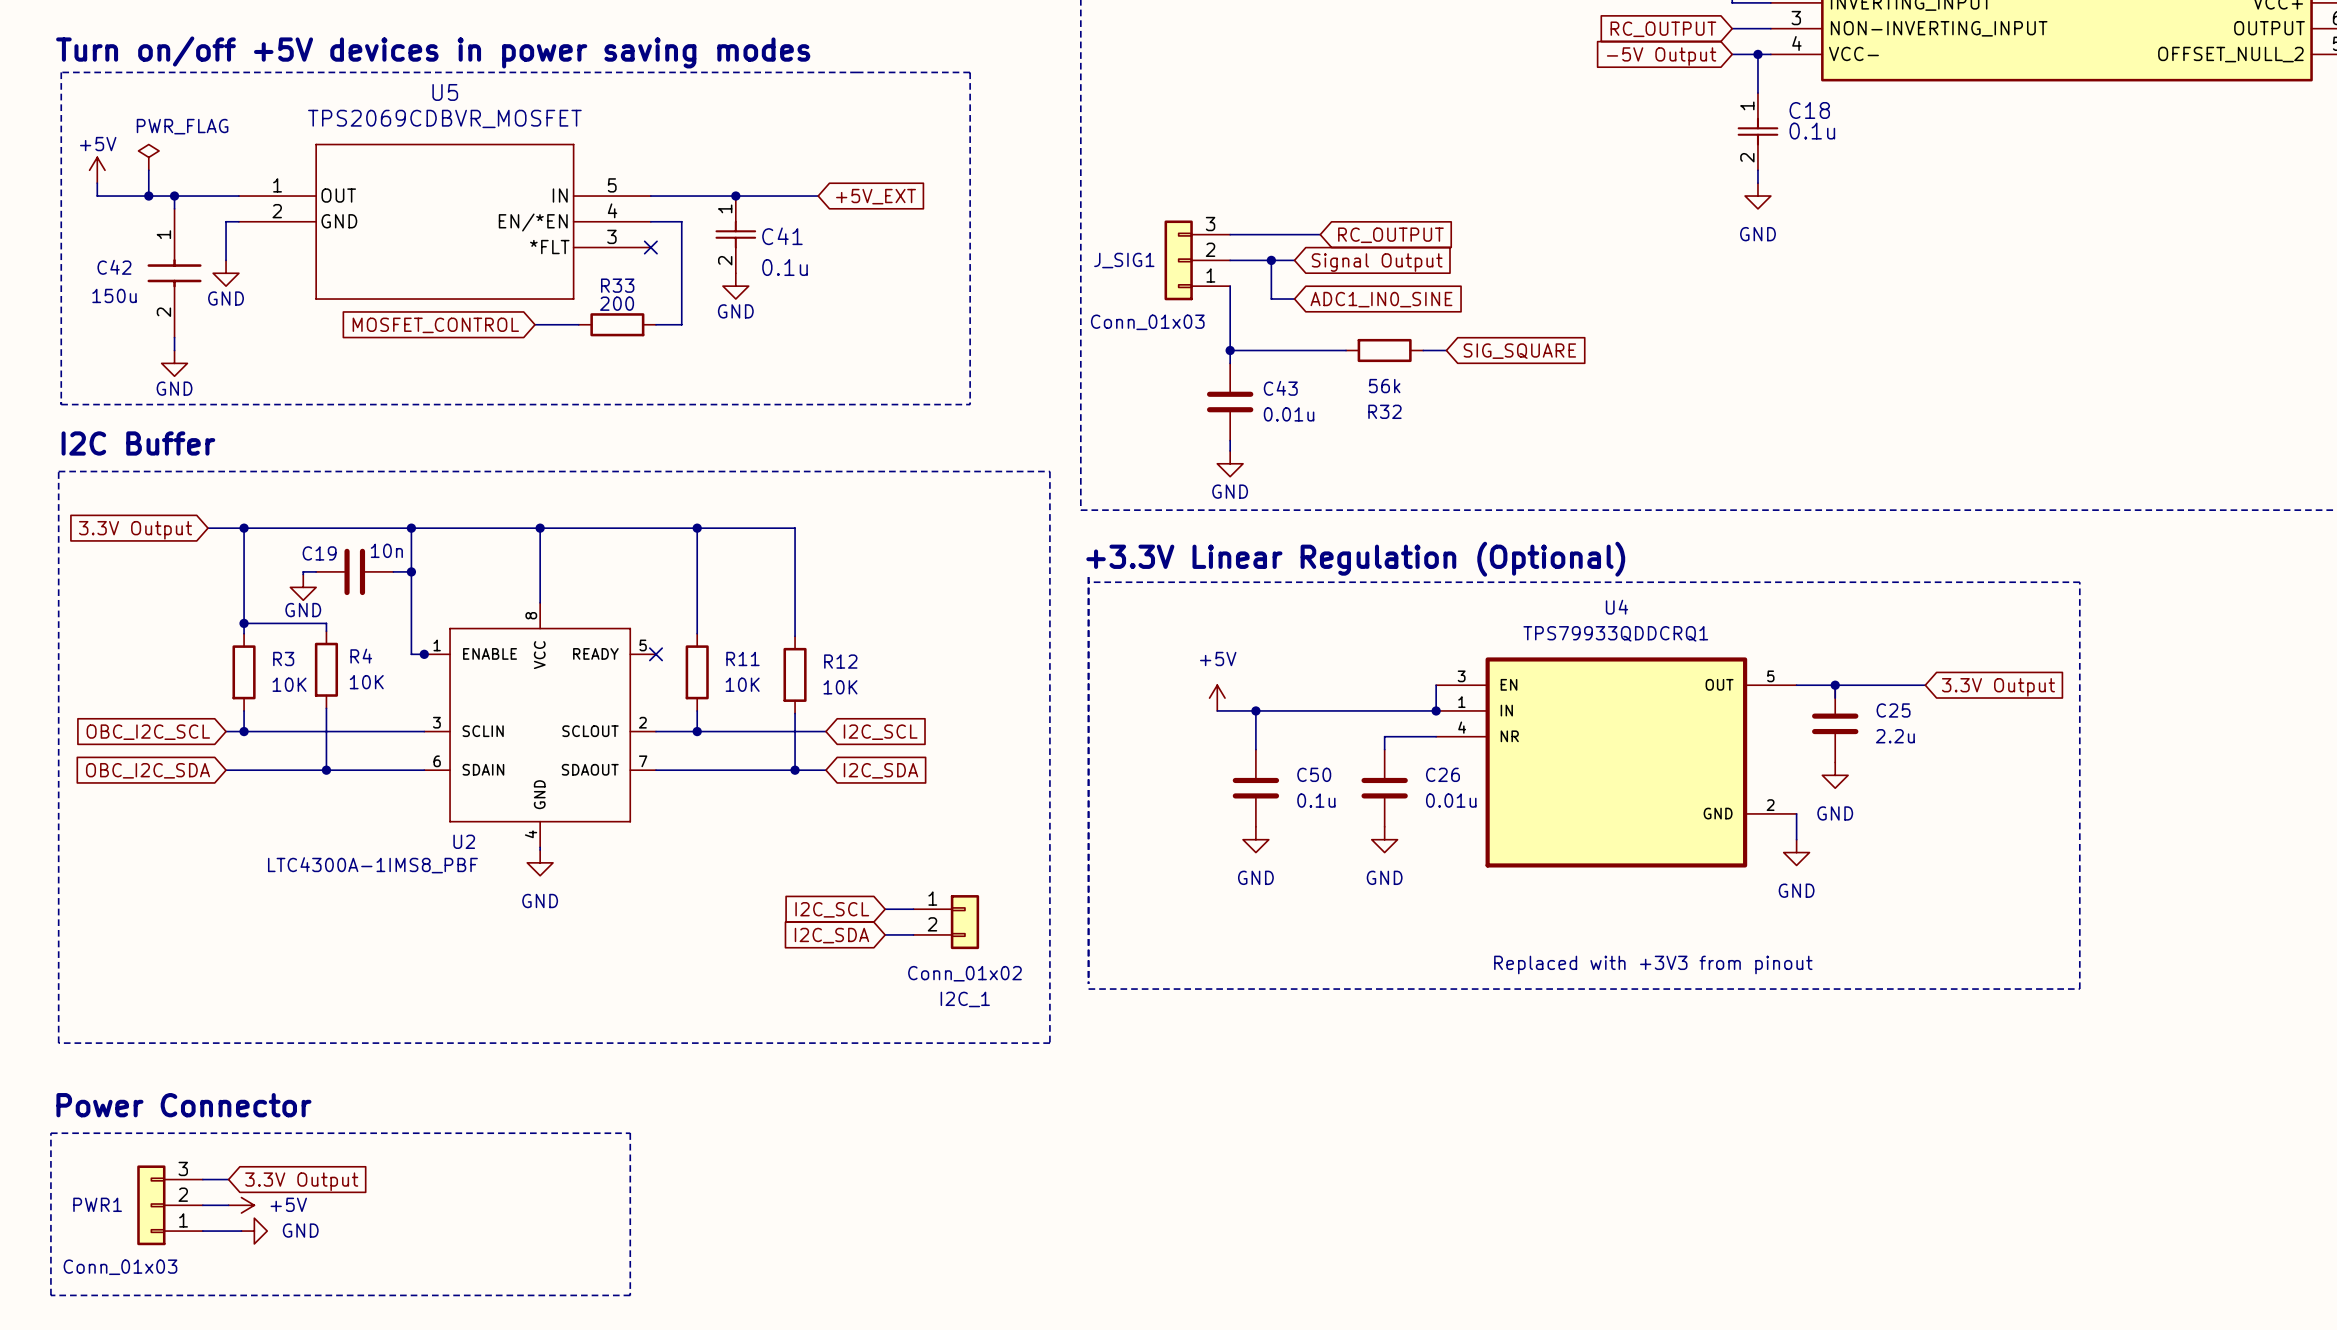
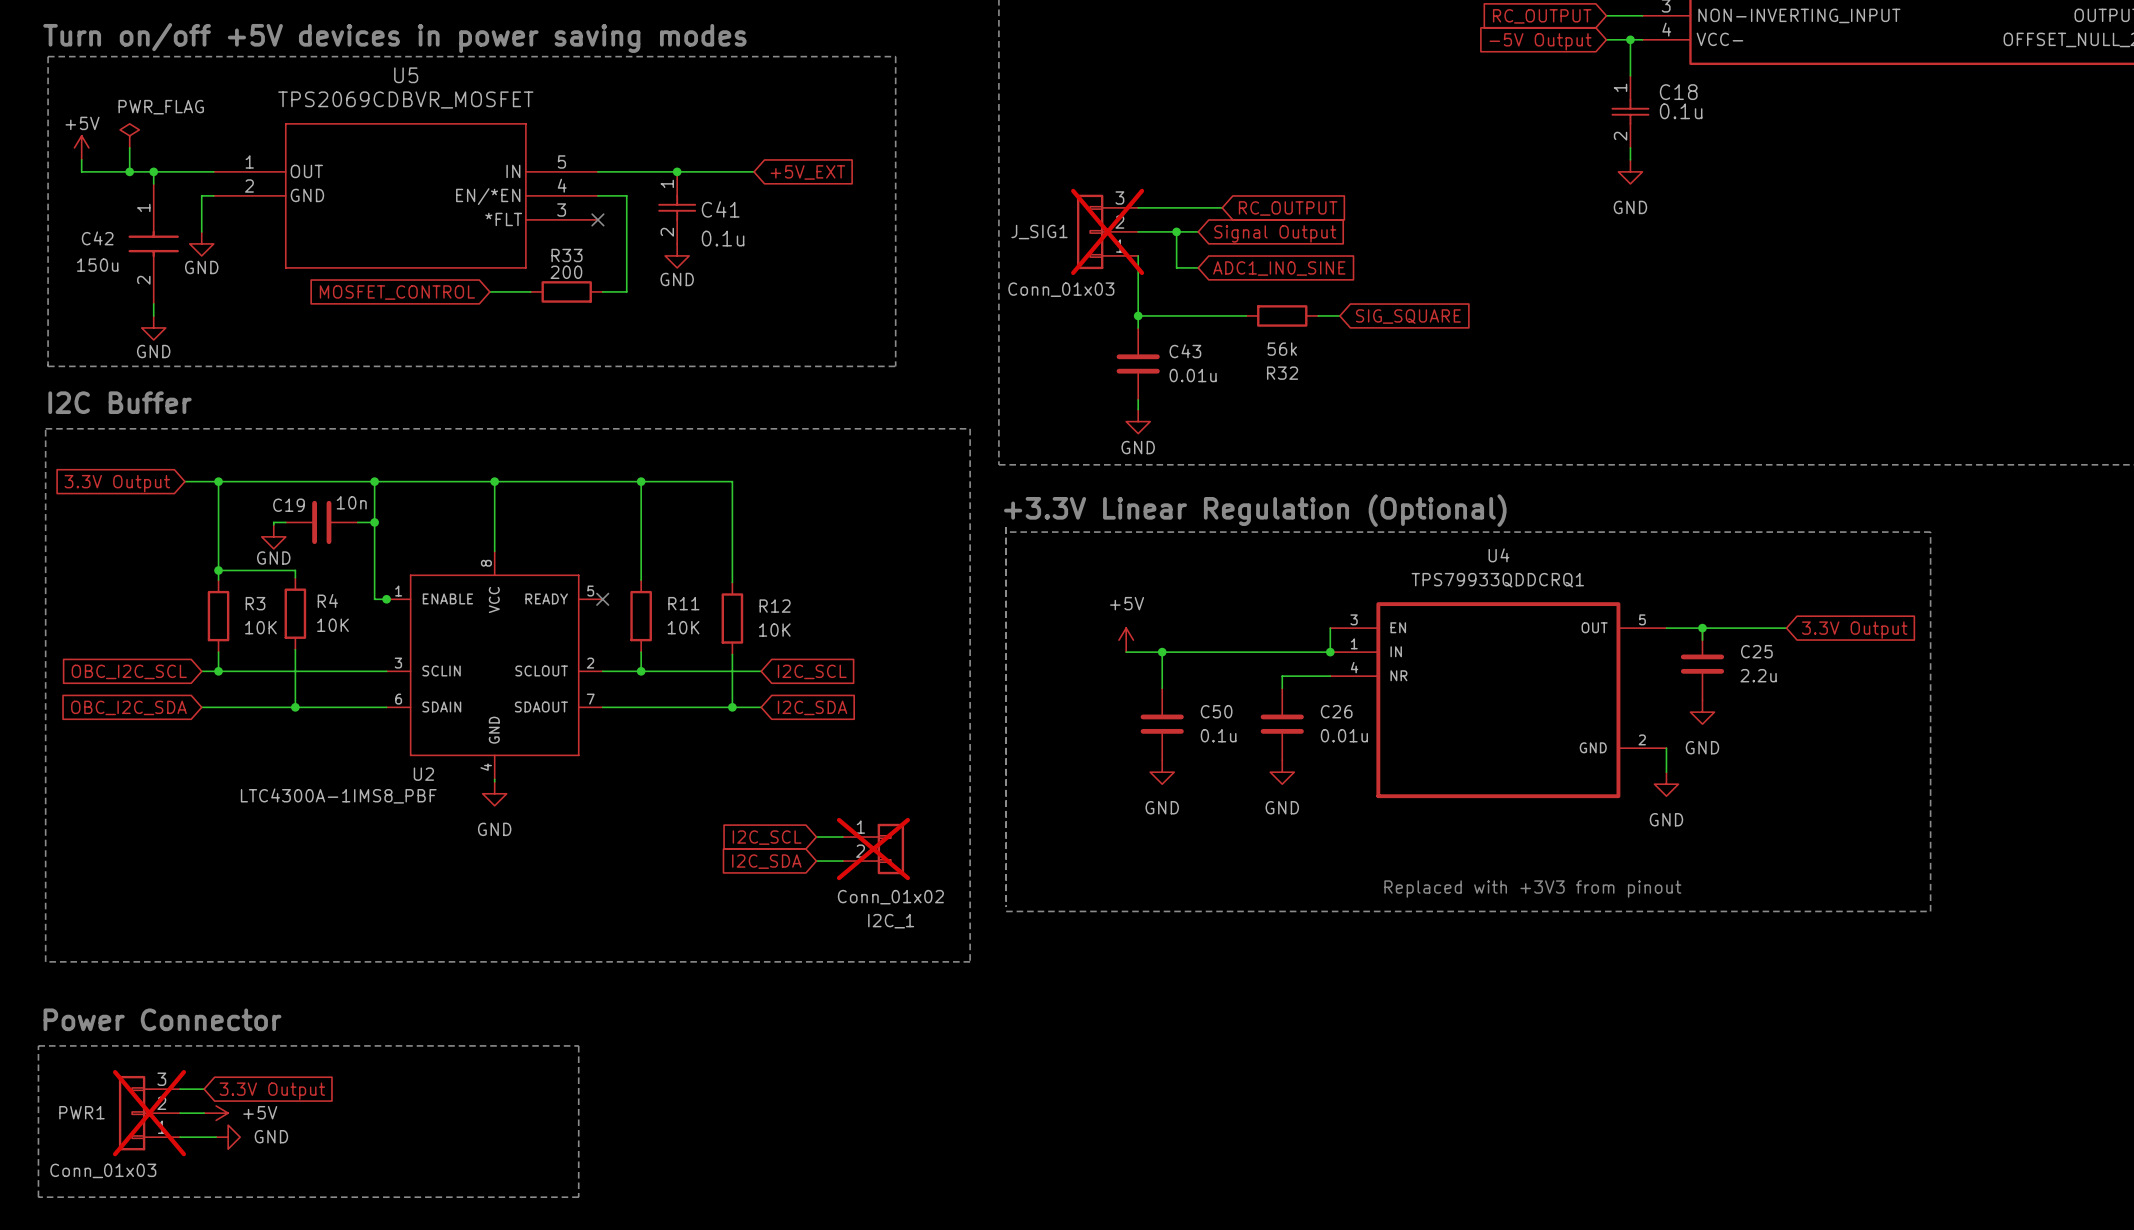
J_SIG1 do-not-place cross: none -> (1107, 231)
I2C_1 do-not-place cross: none -> (873, 849)
PWR1 do-not-place cross: none -> (149, 1113)

